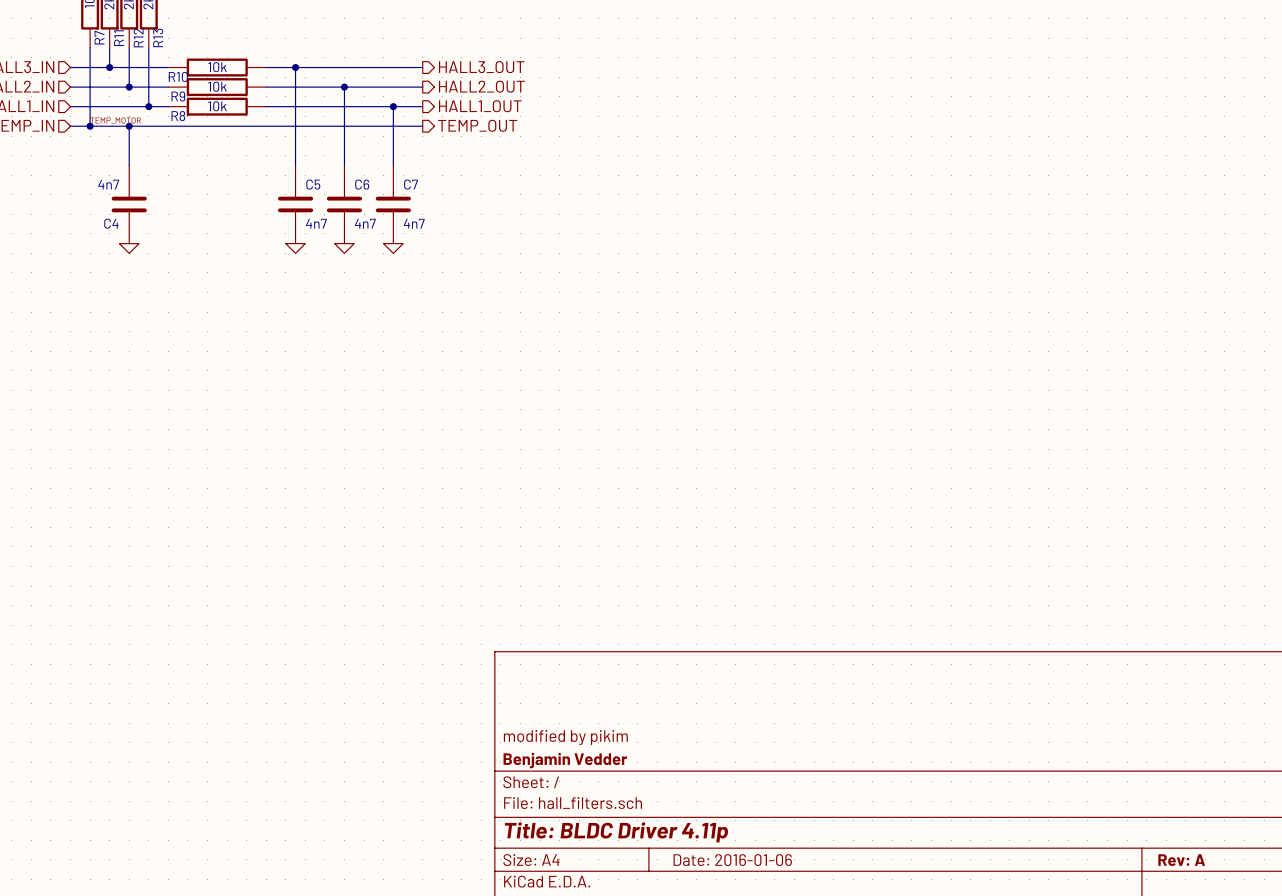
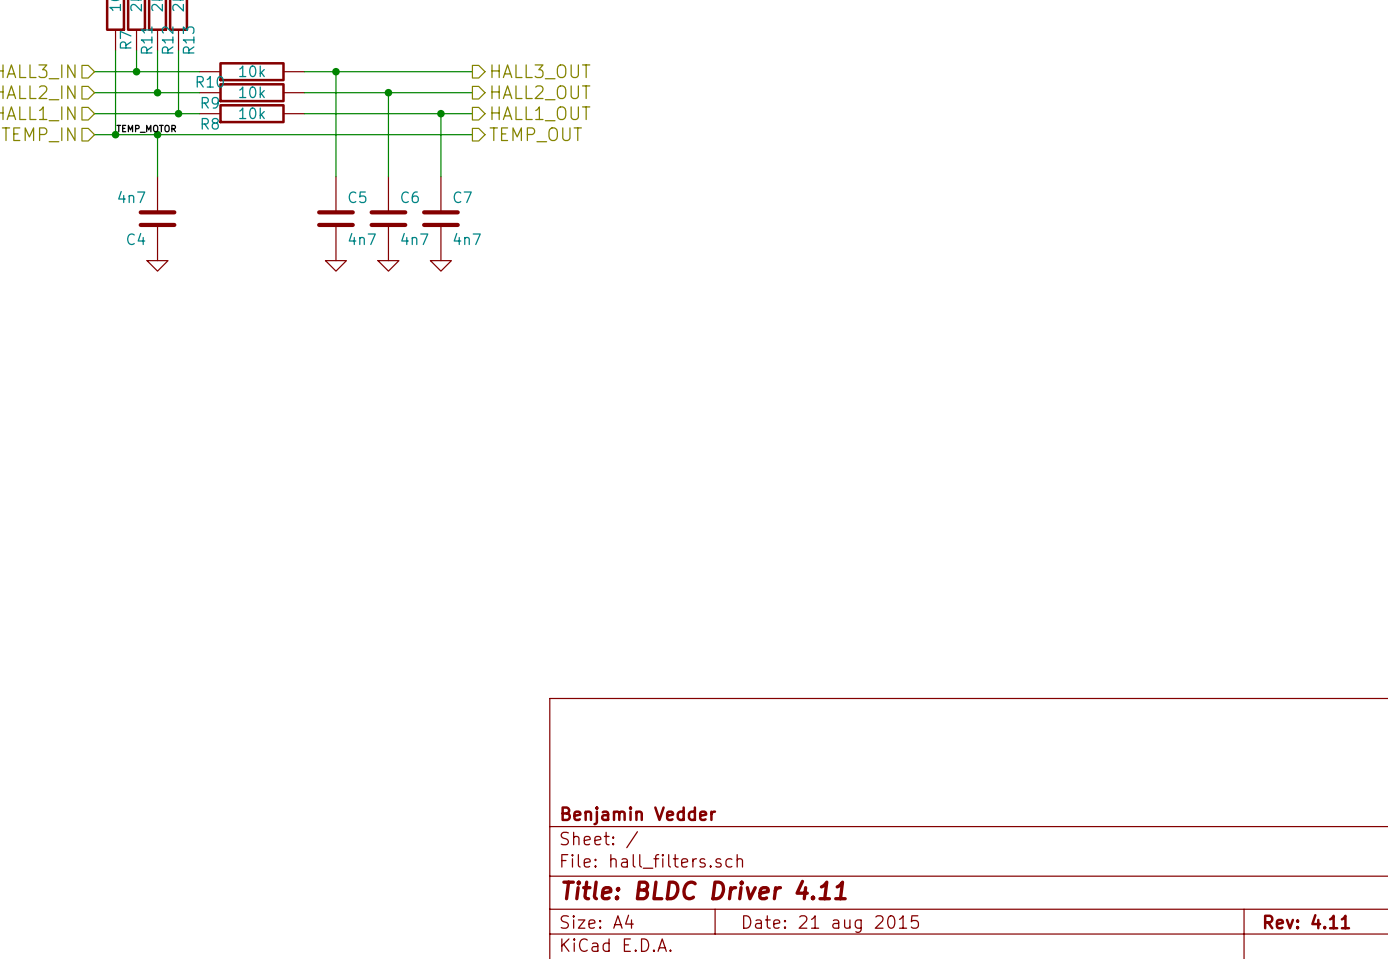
title block: modified by pikim (565, 737) -> none
title block: Title: BLDC Driver 4.11p (616, 832) -> Title: BLDC Driver 4.11 (704, 890)
title block: Date: 2016-01-06 (732, 860) -> Date: 21 aug 2015 (831, 924)
title block: Rev: A (1181, 860) -> Rev: 4.11 (1307, 921)

